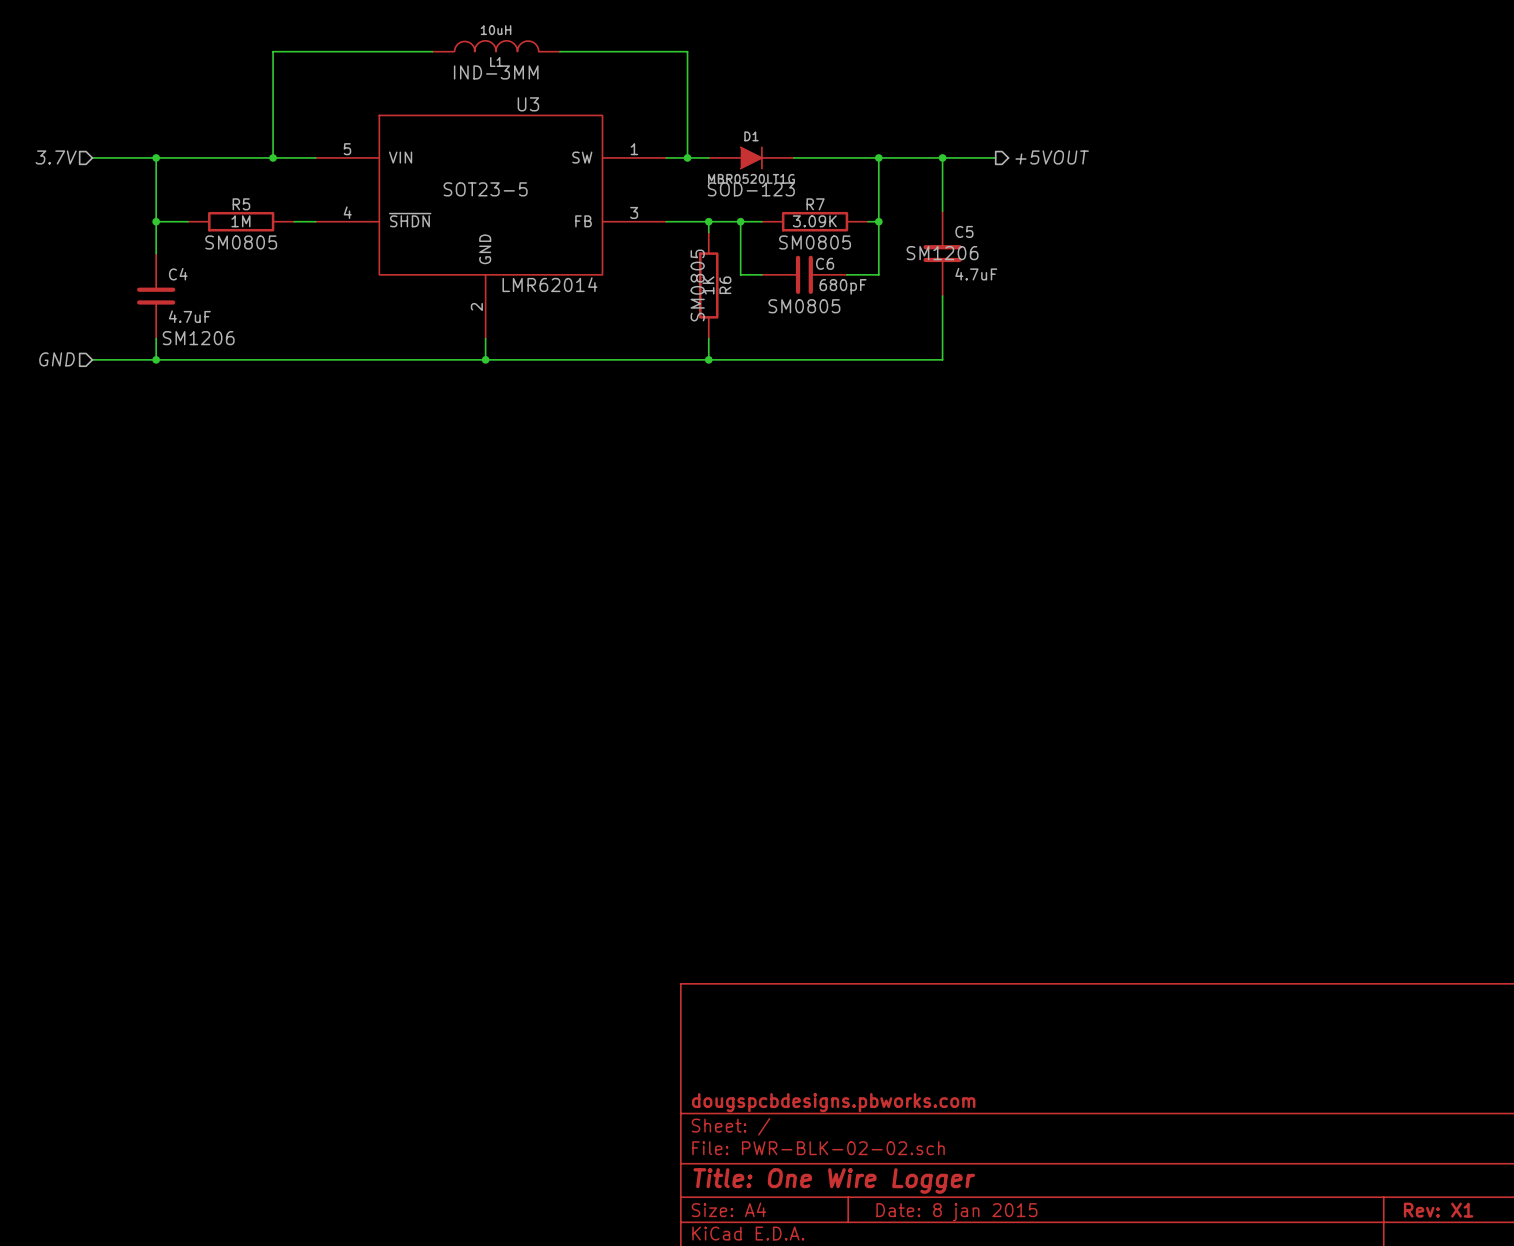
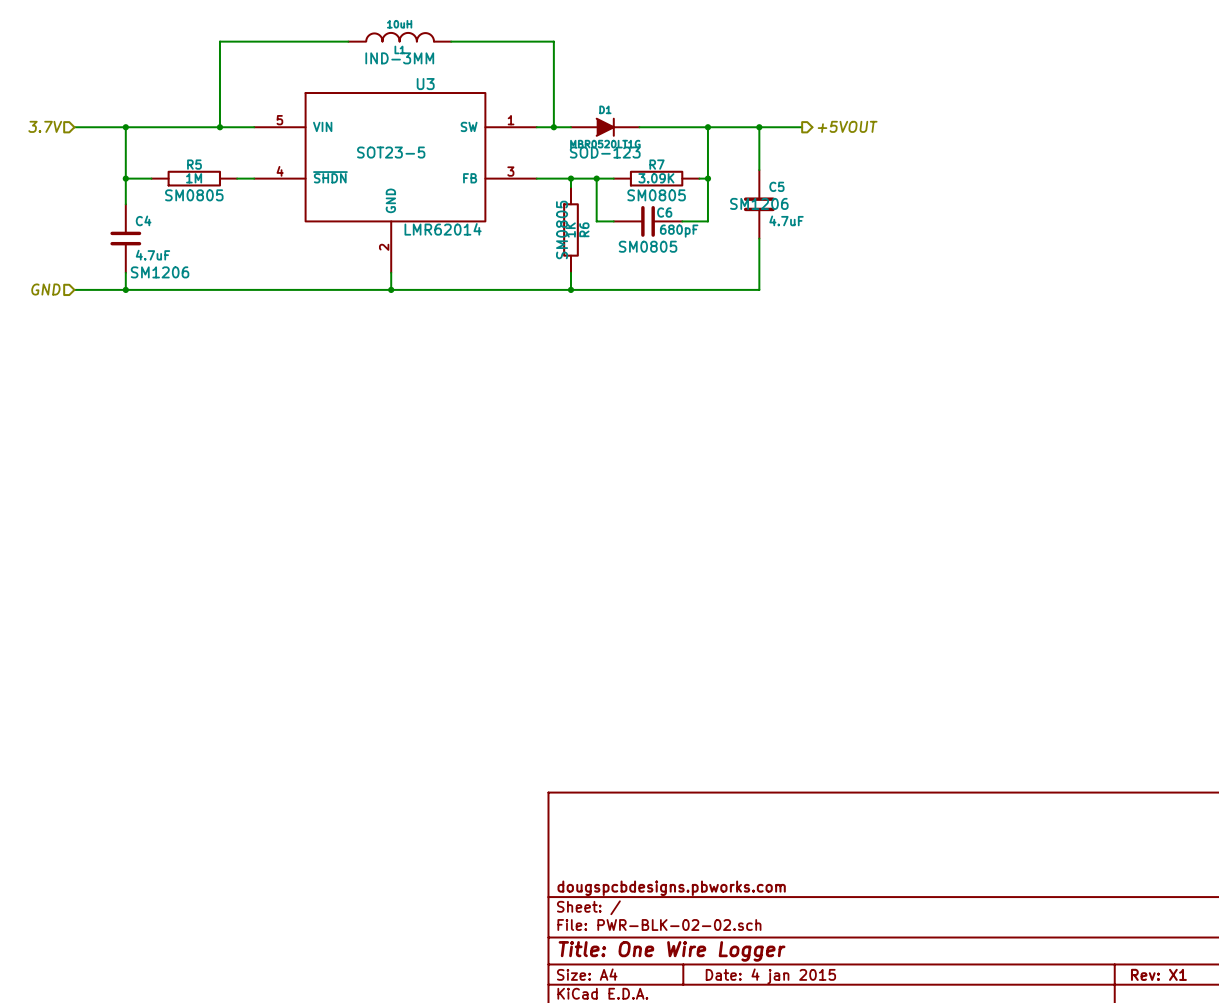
title block: Date: 8 jan 2015 (956, 1212) -> Date: 4 jan 2015 (770, 976)

